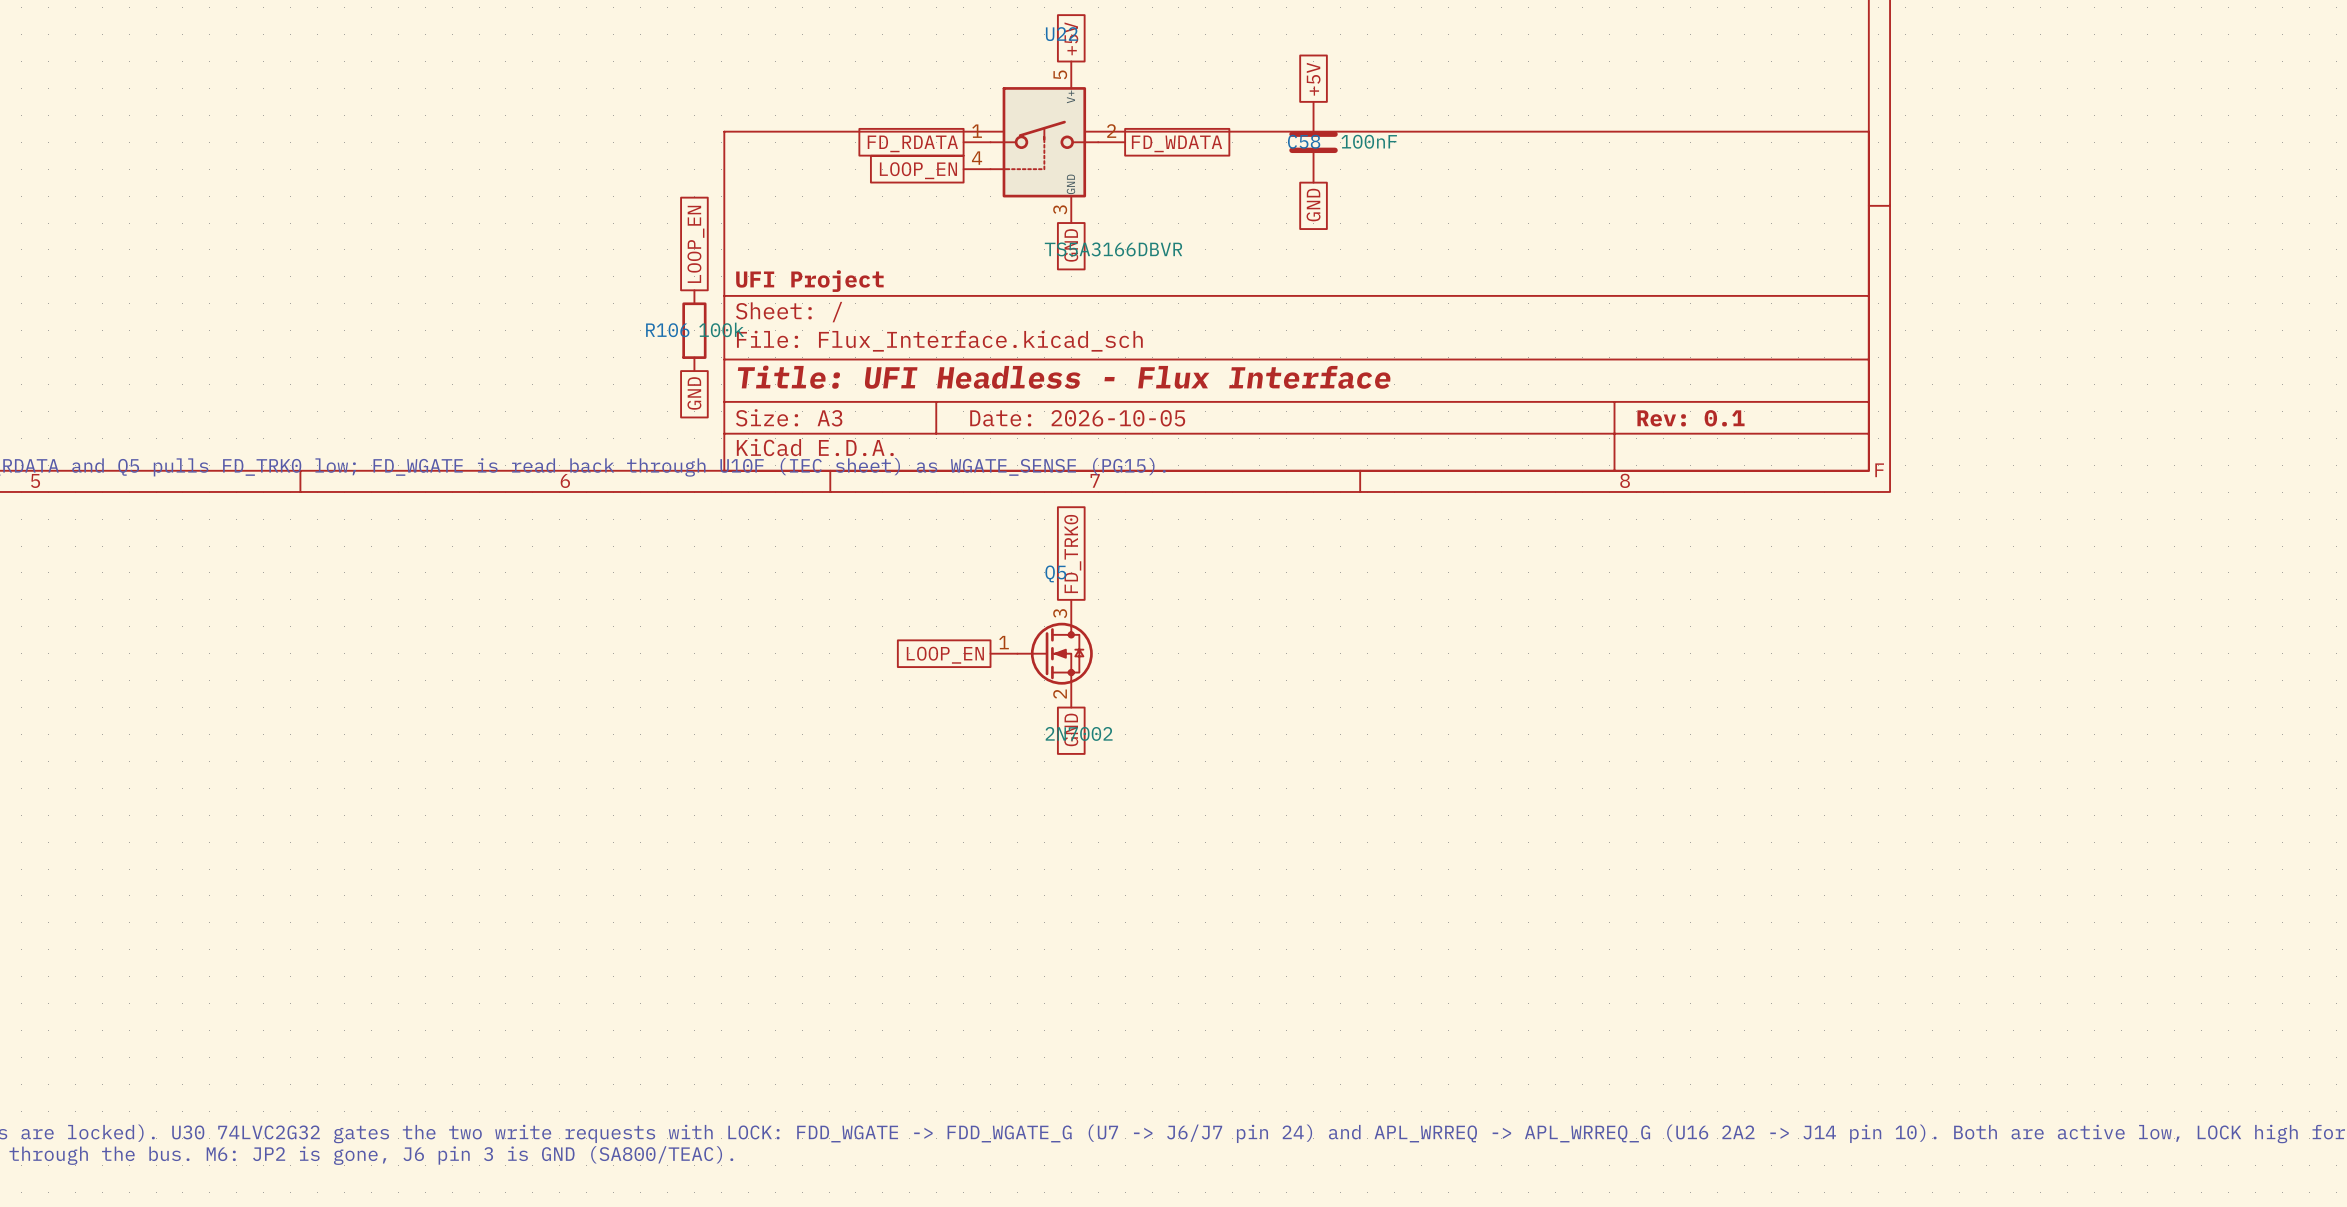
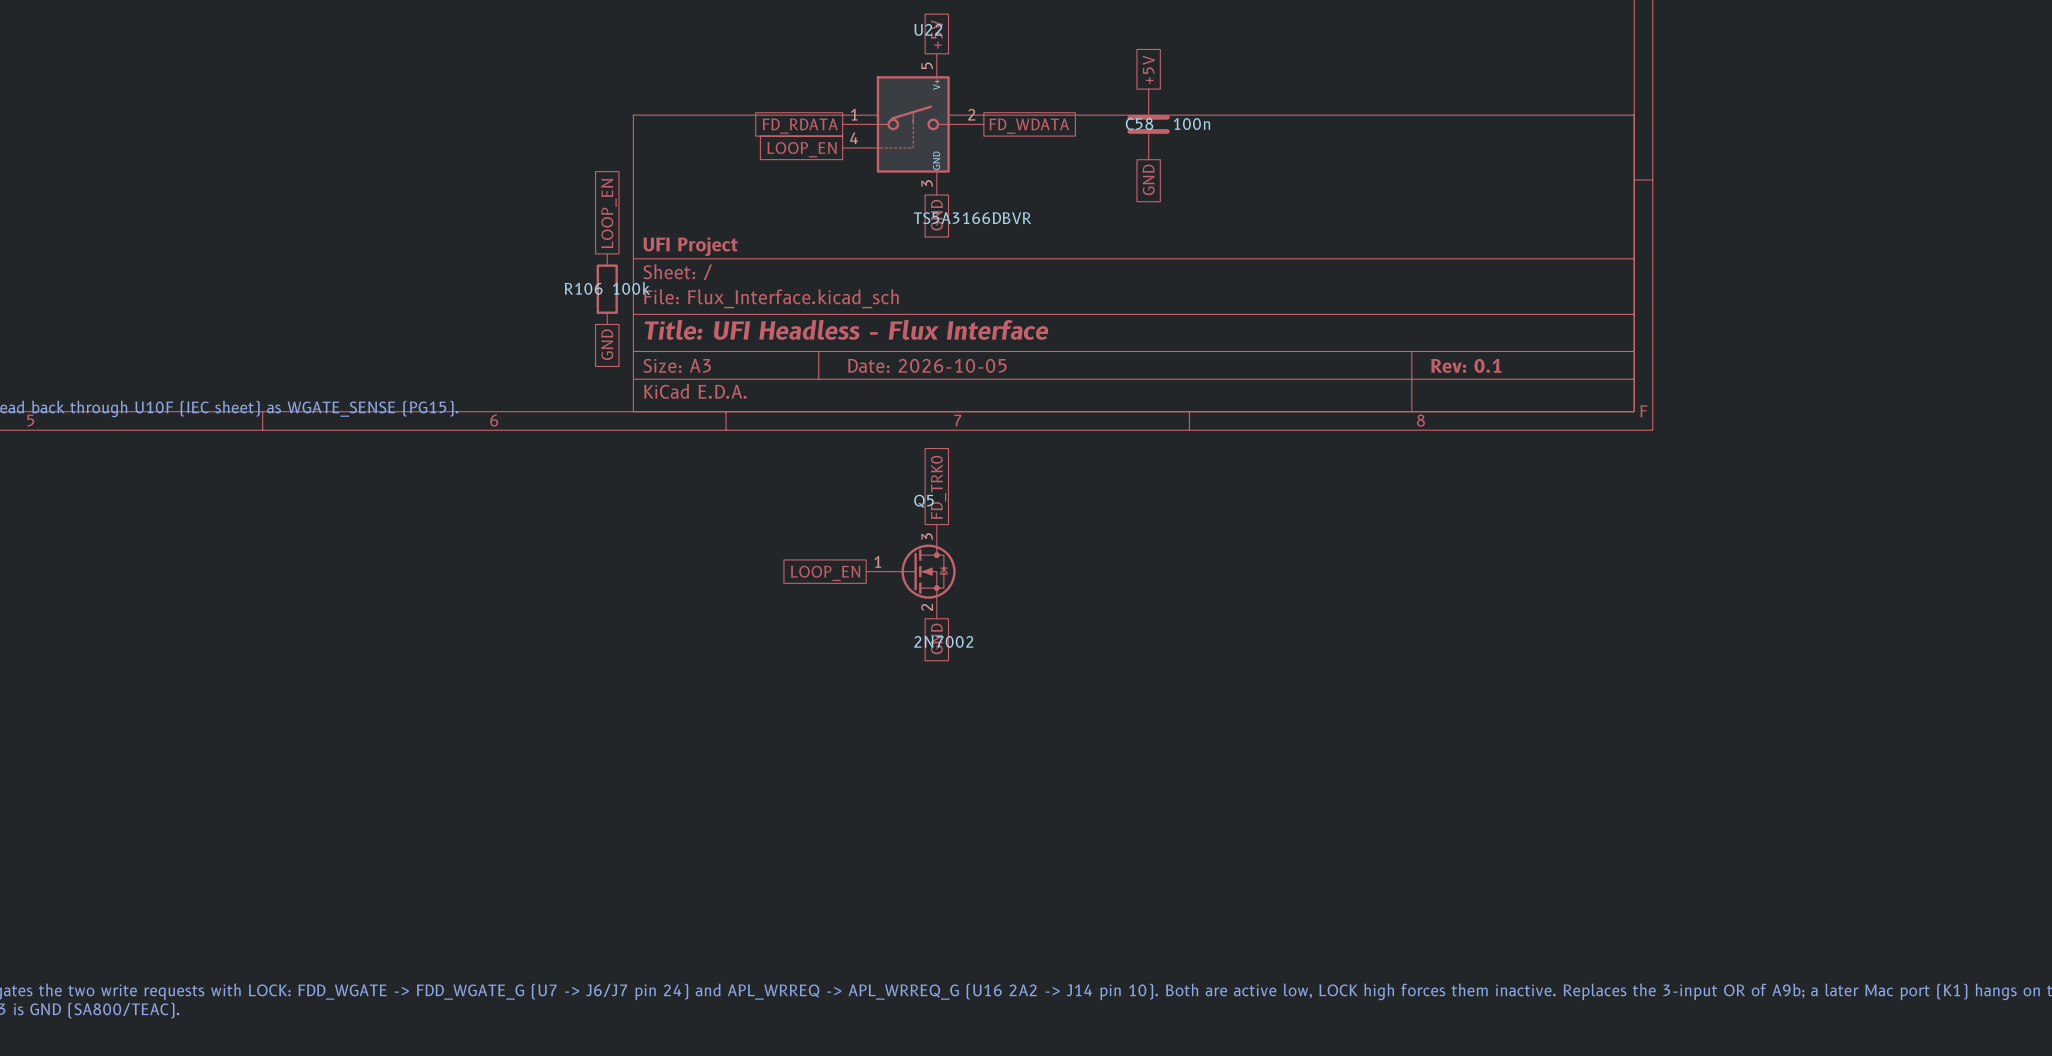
C58 value: 100nF (1369, 141) -> 100n (1191, 124)

